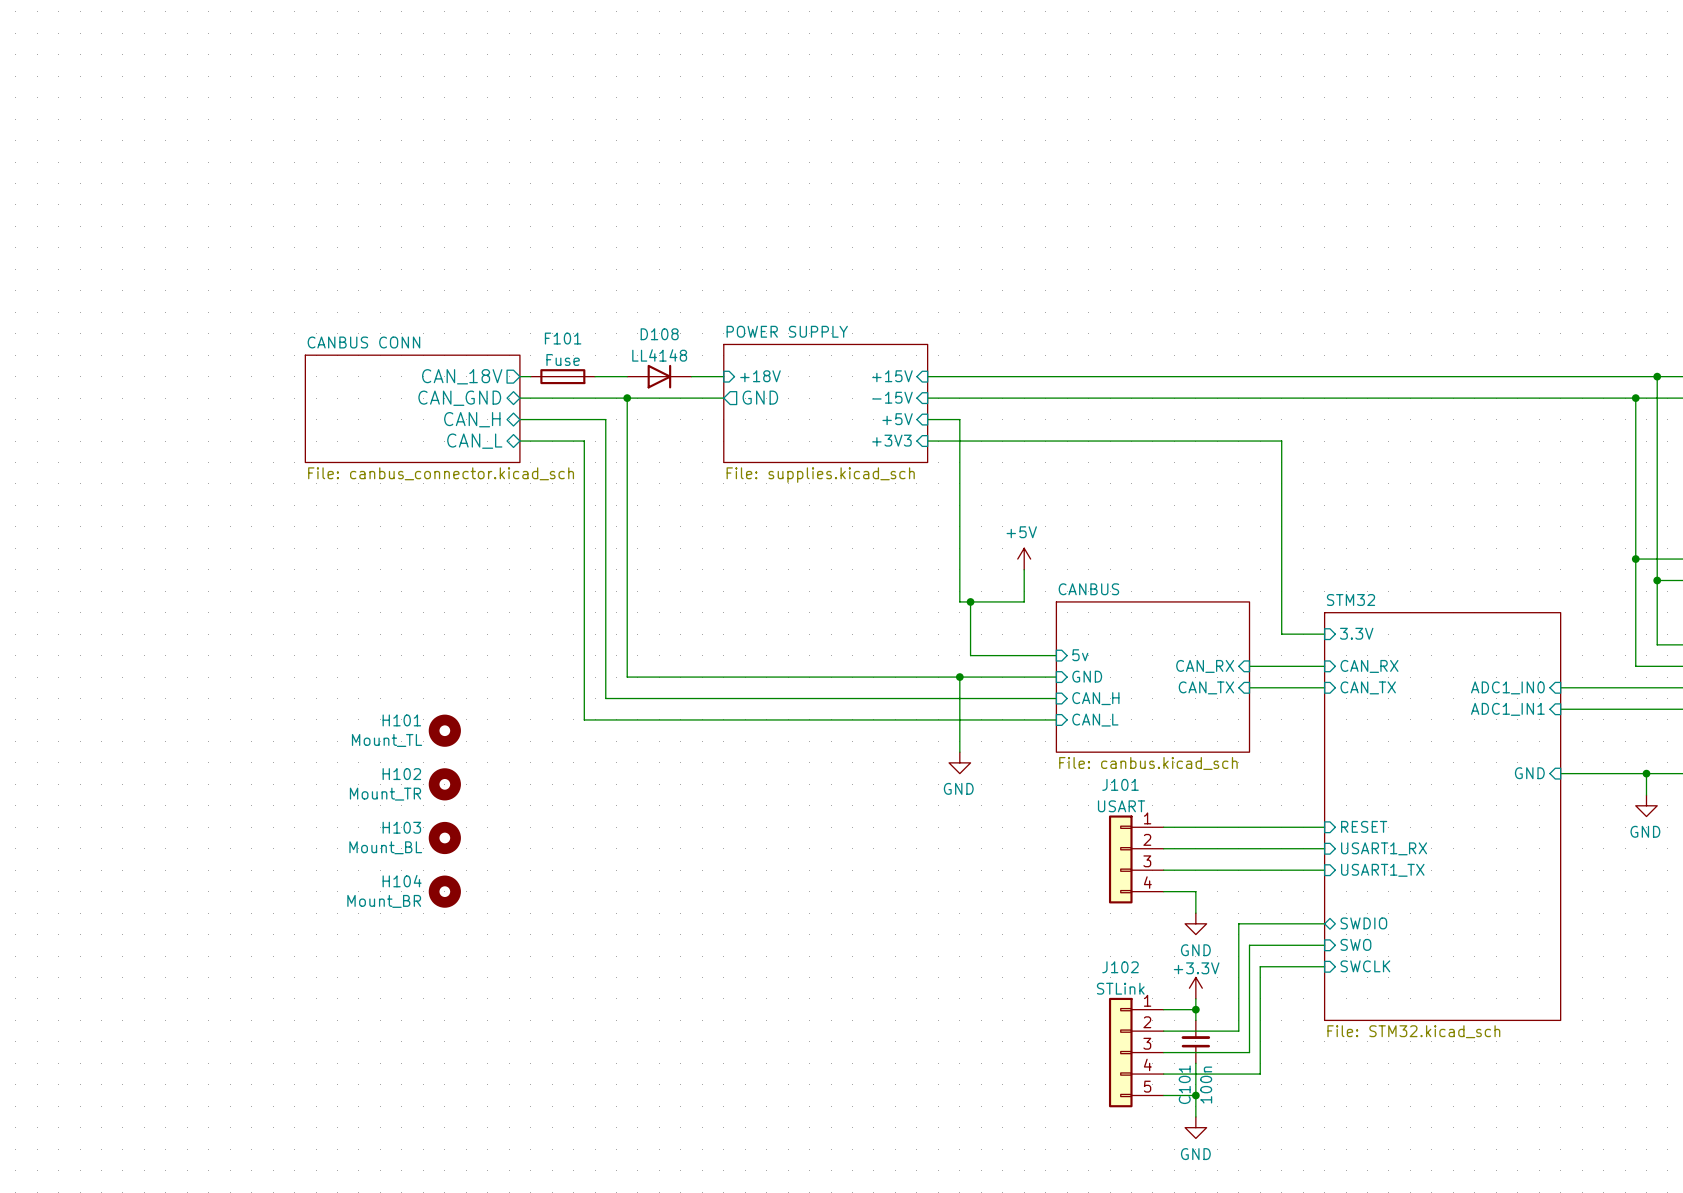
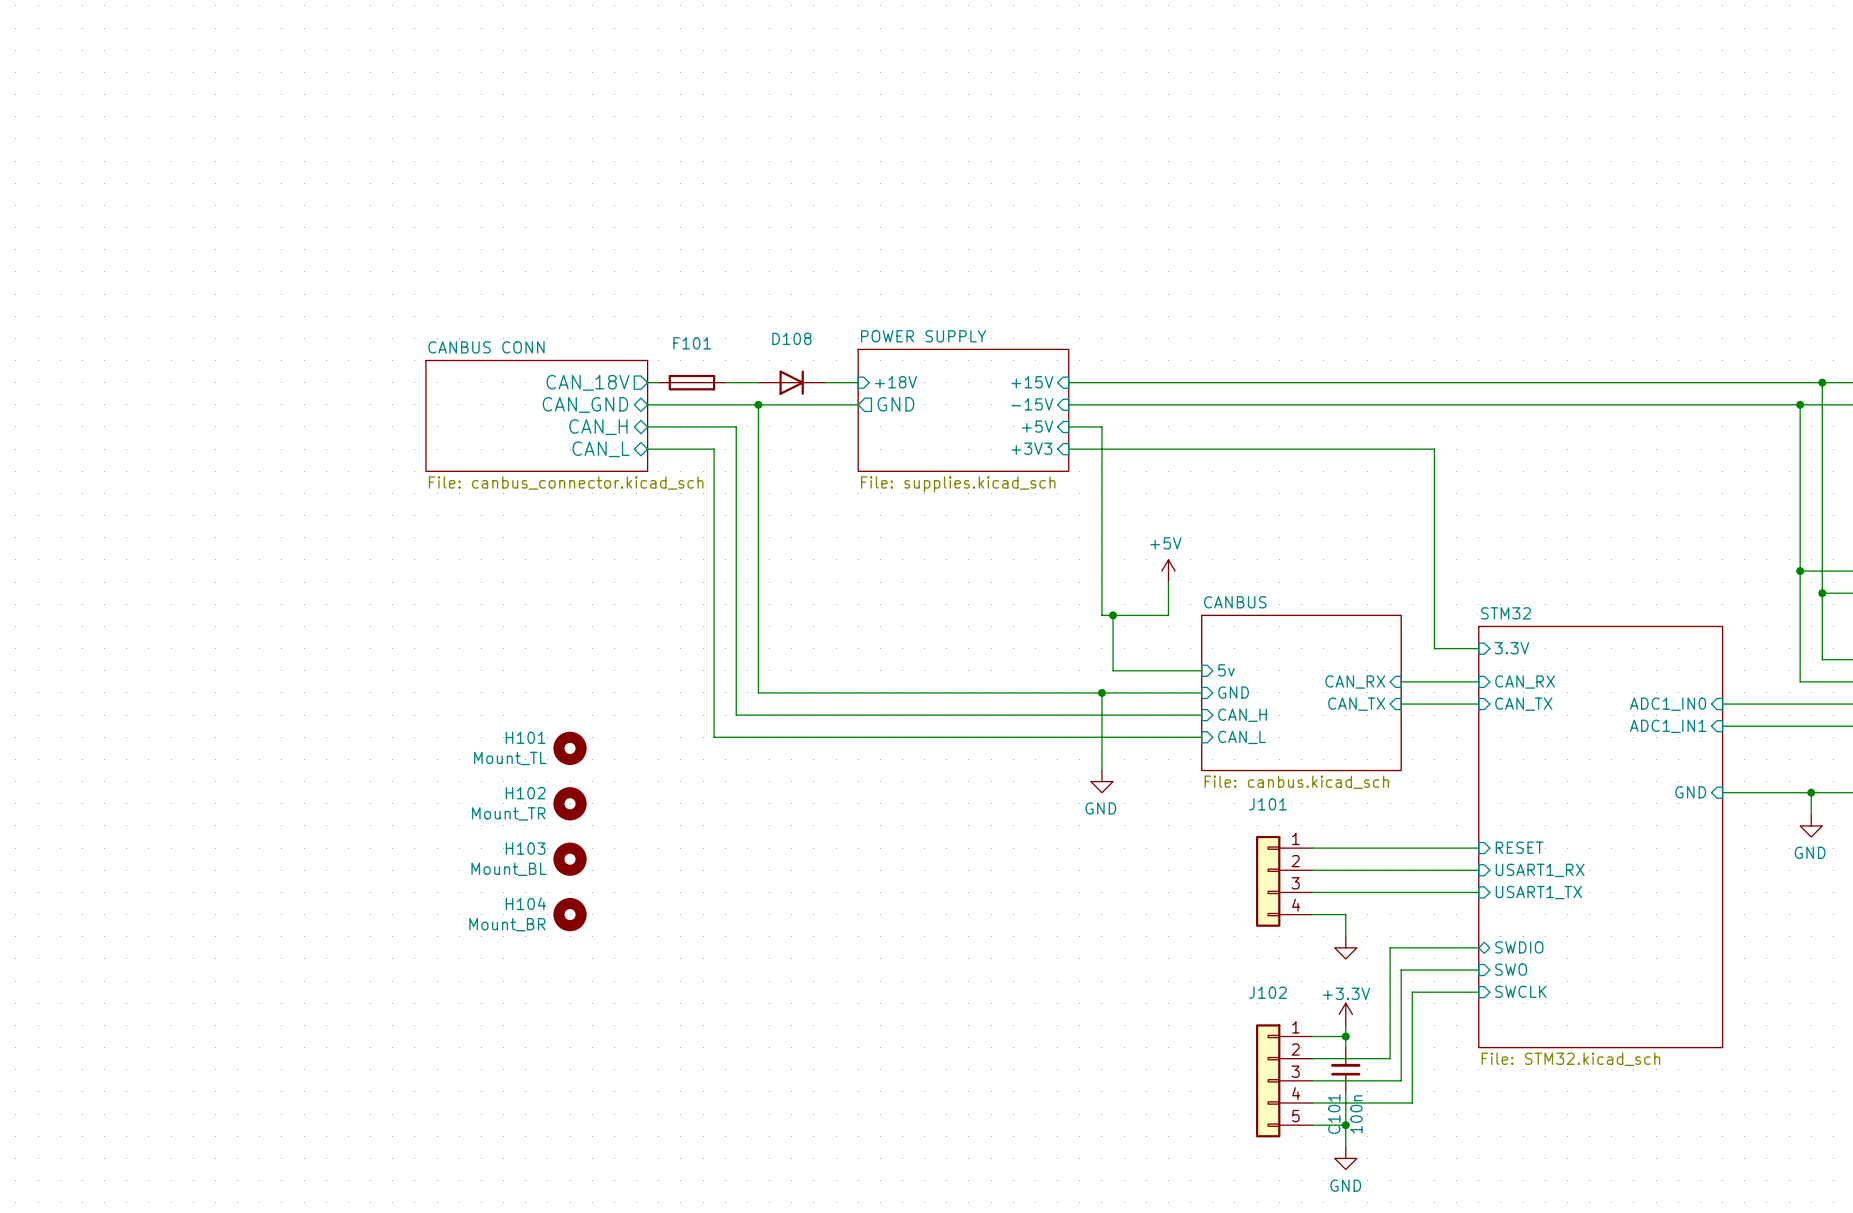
D108 value: LL4148 (659, 355) -> none
F101 value: Fuse (563, 359) -> none
J101 value: USART (1121, 806) -> none
power symbol text: GND (1195, 950) -> none
J102 value: STLink (1120, 988) -> none

